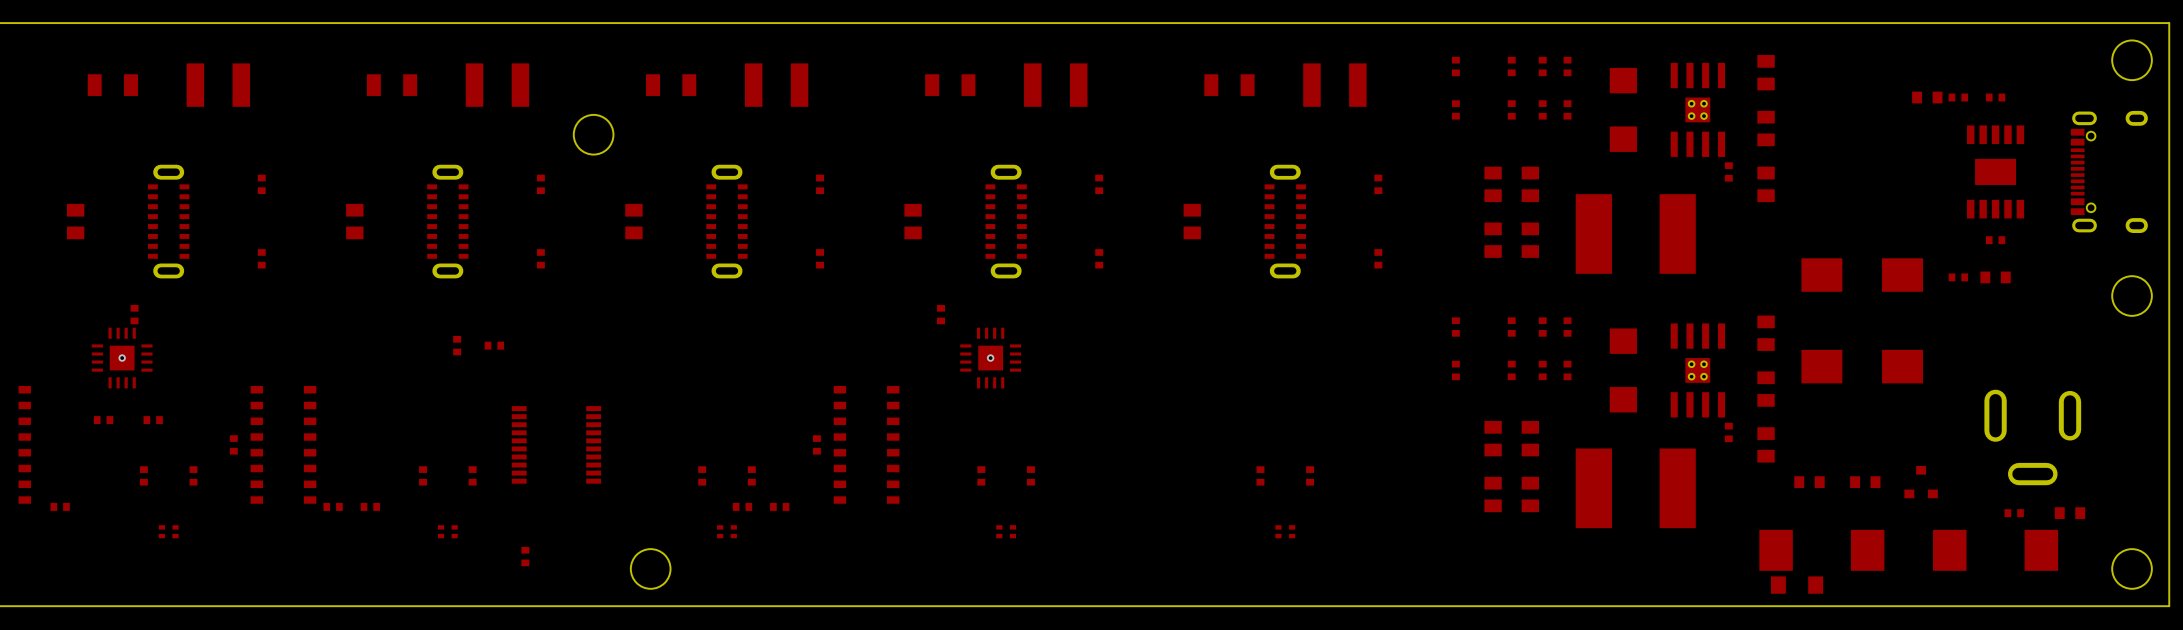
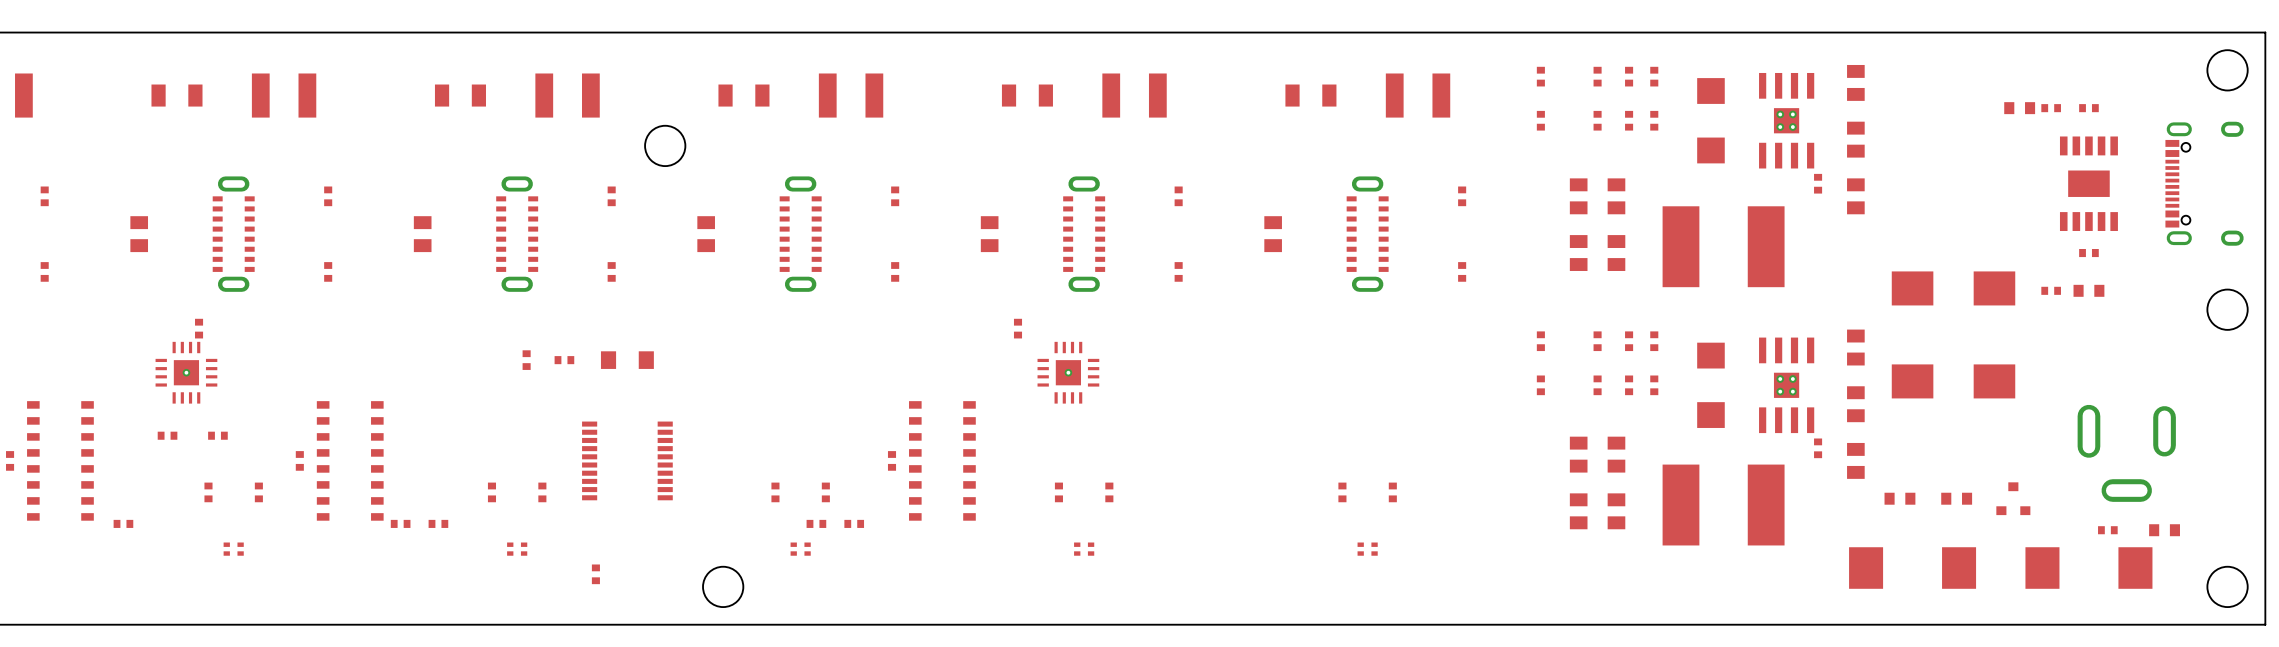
part: none -> (627, 360)
part: (1797, 585) -> none

